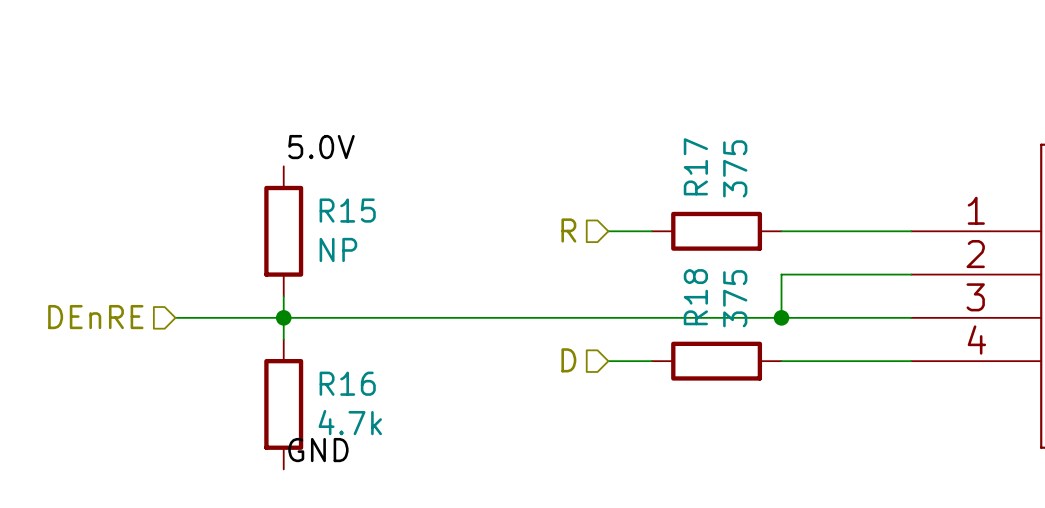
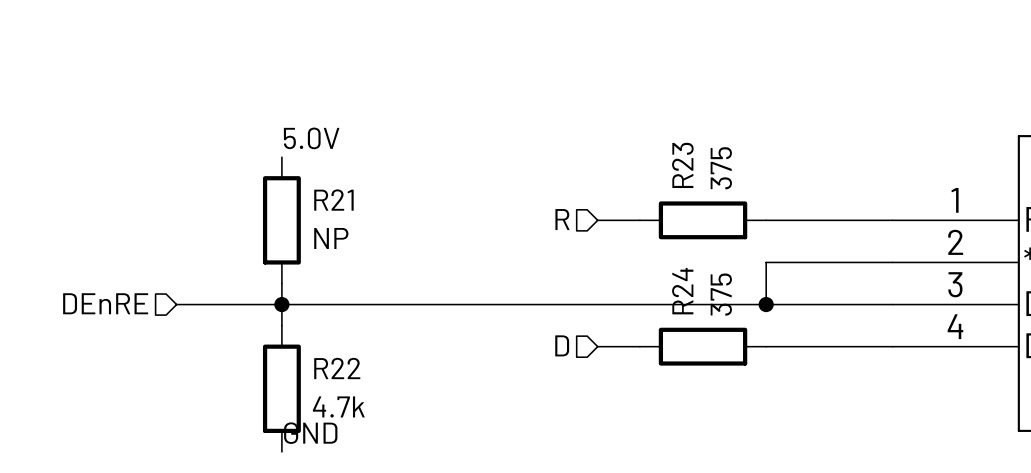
R17 name: R17 (695, 166) -> R23 (682, 165)
R15 name: R15 (347, 210) -> R21 (333, 200)
R18 name: R18 (695, 297) -> R24 (682, 291)
R16 name: R16 (347, 383) -> R22 (337, 368)

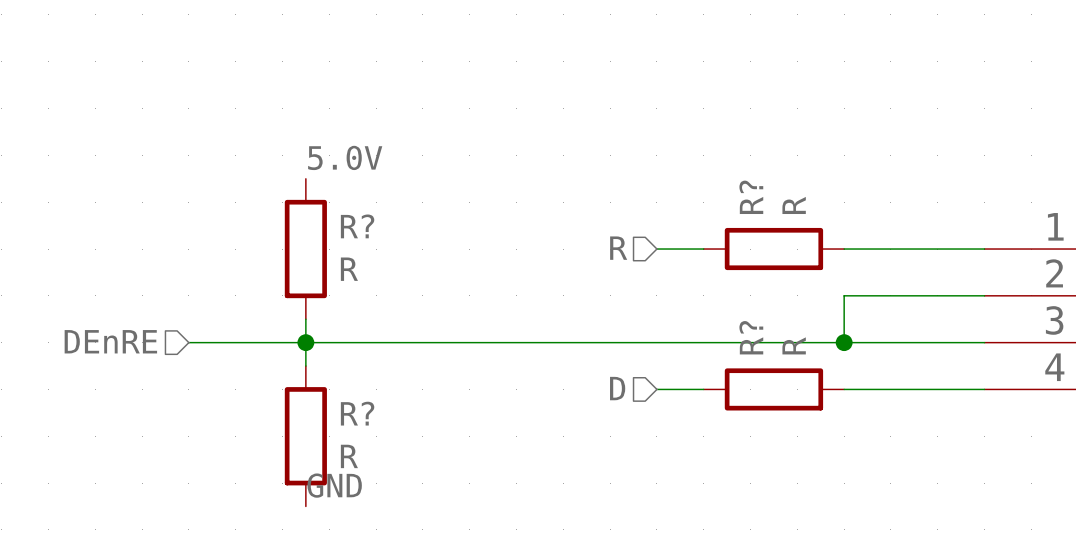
R23 name: R23 (682, 165) -> R? (751, 197)
R23 value: 375 (721, 168) -> R (794, 205)
R21 name: R21 (333, 200) -> R? (357, 226)
R21 value: NP (331, 238) -> R (349, 269)
R24 name: R24 (682, 291) -> R? (751, 337)
R24 value: 375 (721, 294) -> R (794, 345)
R22 name: R22 (337, 368) -> R? (357, 413)
R22 value: 4.7k (338, 406) -> R (349, 456)

